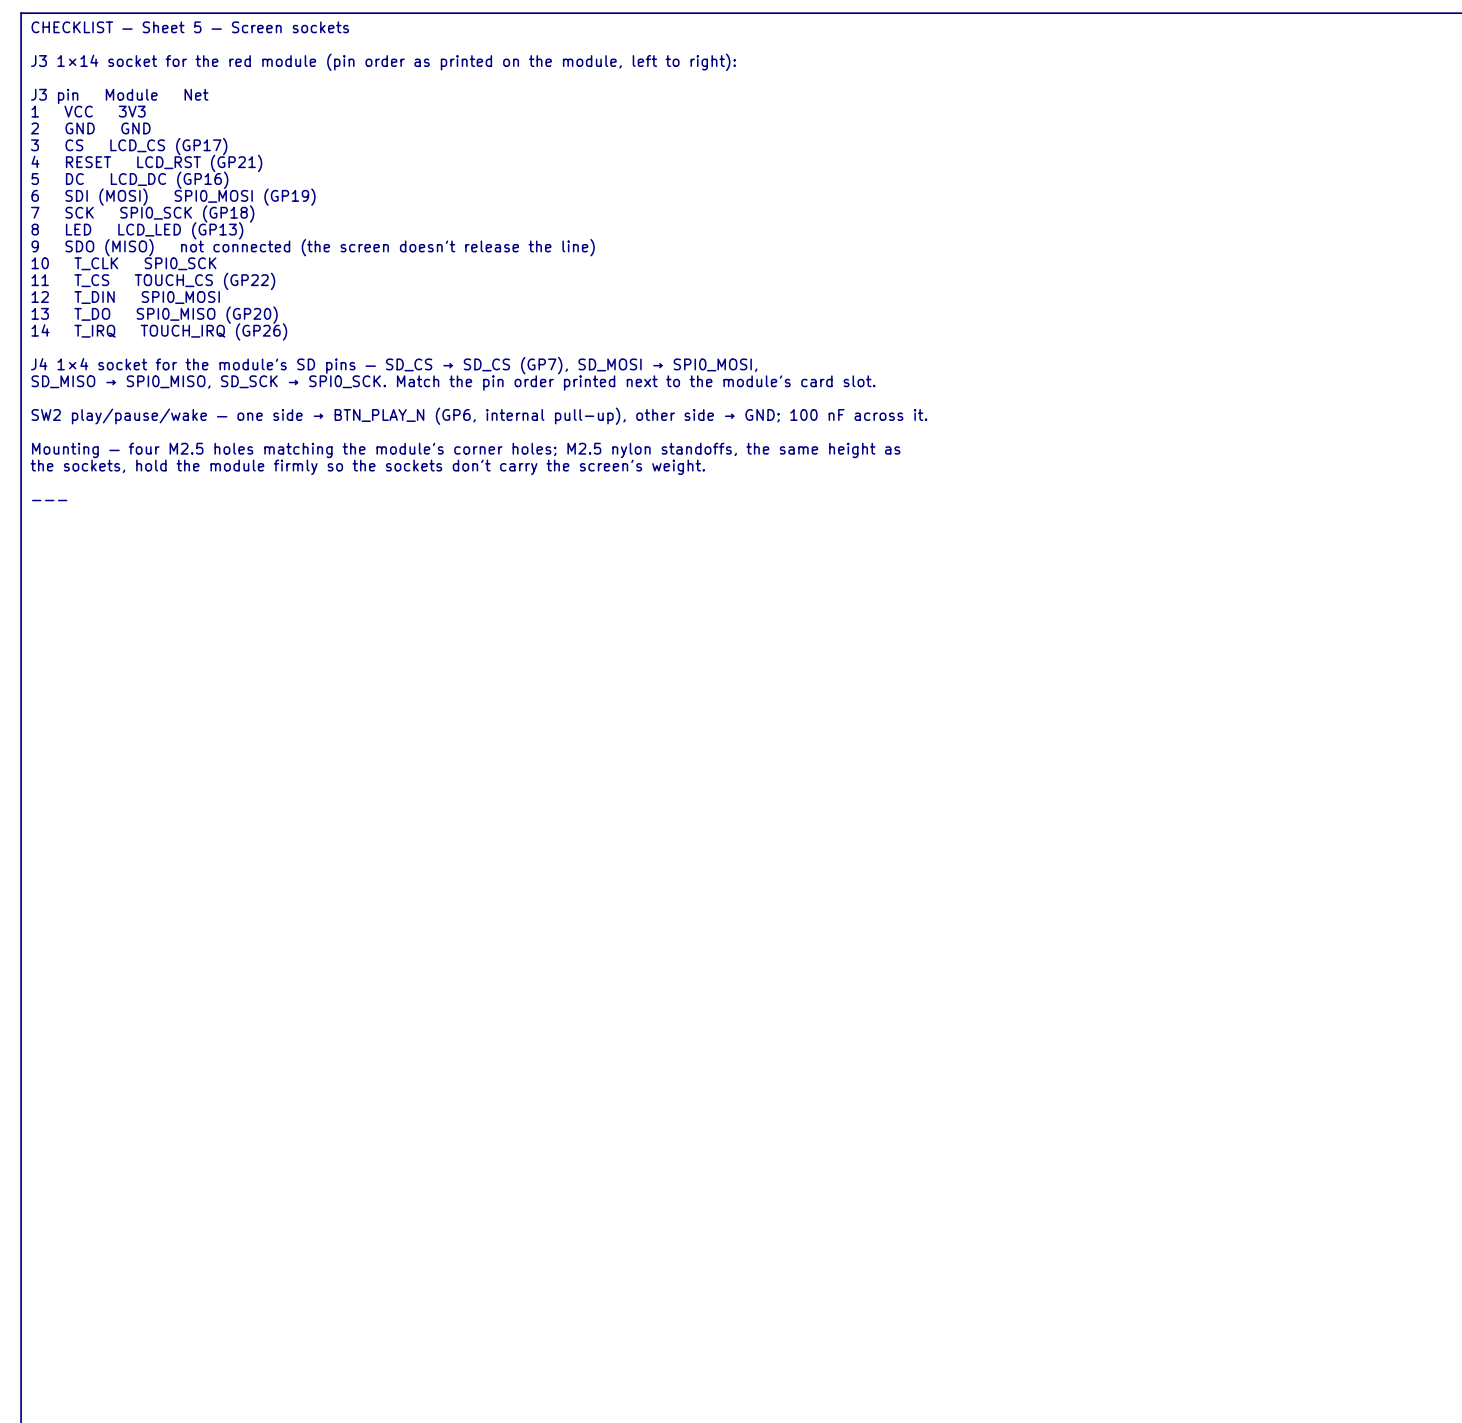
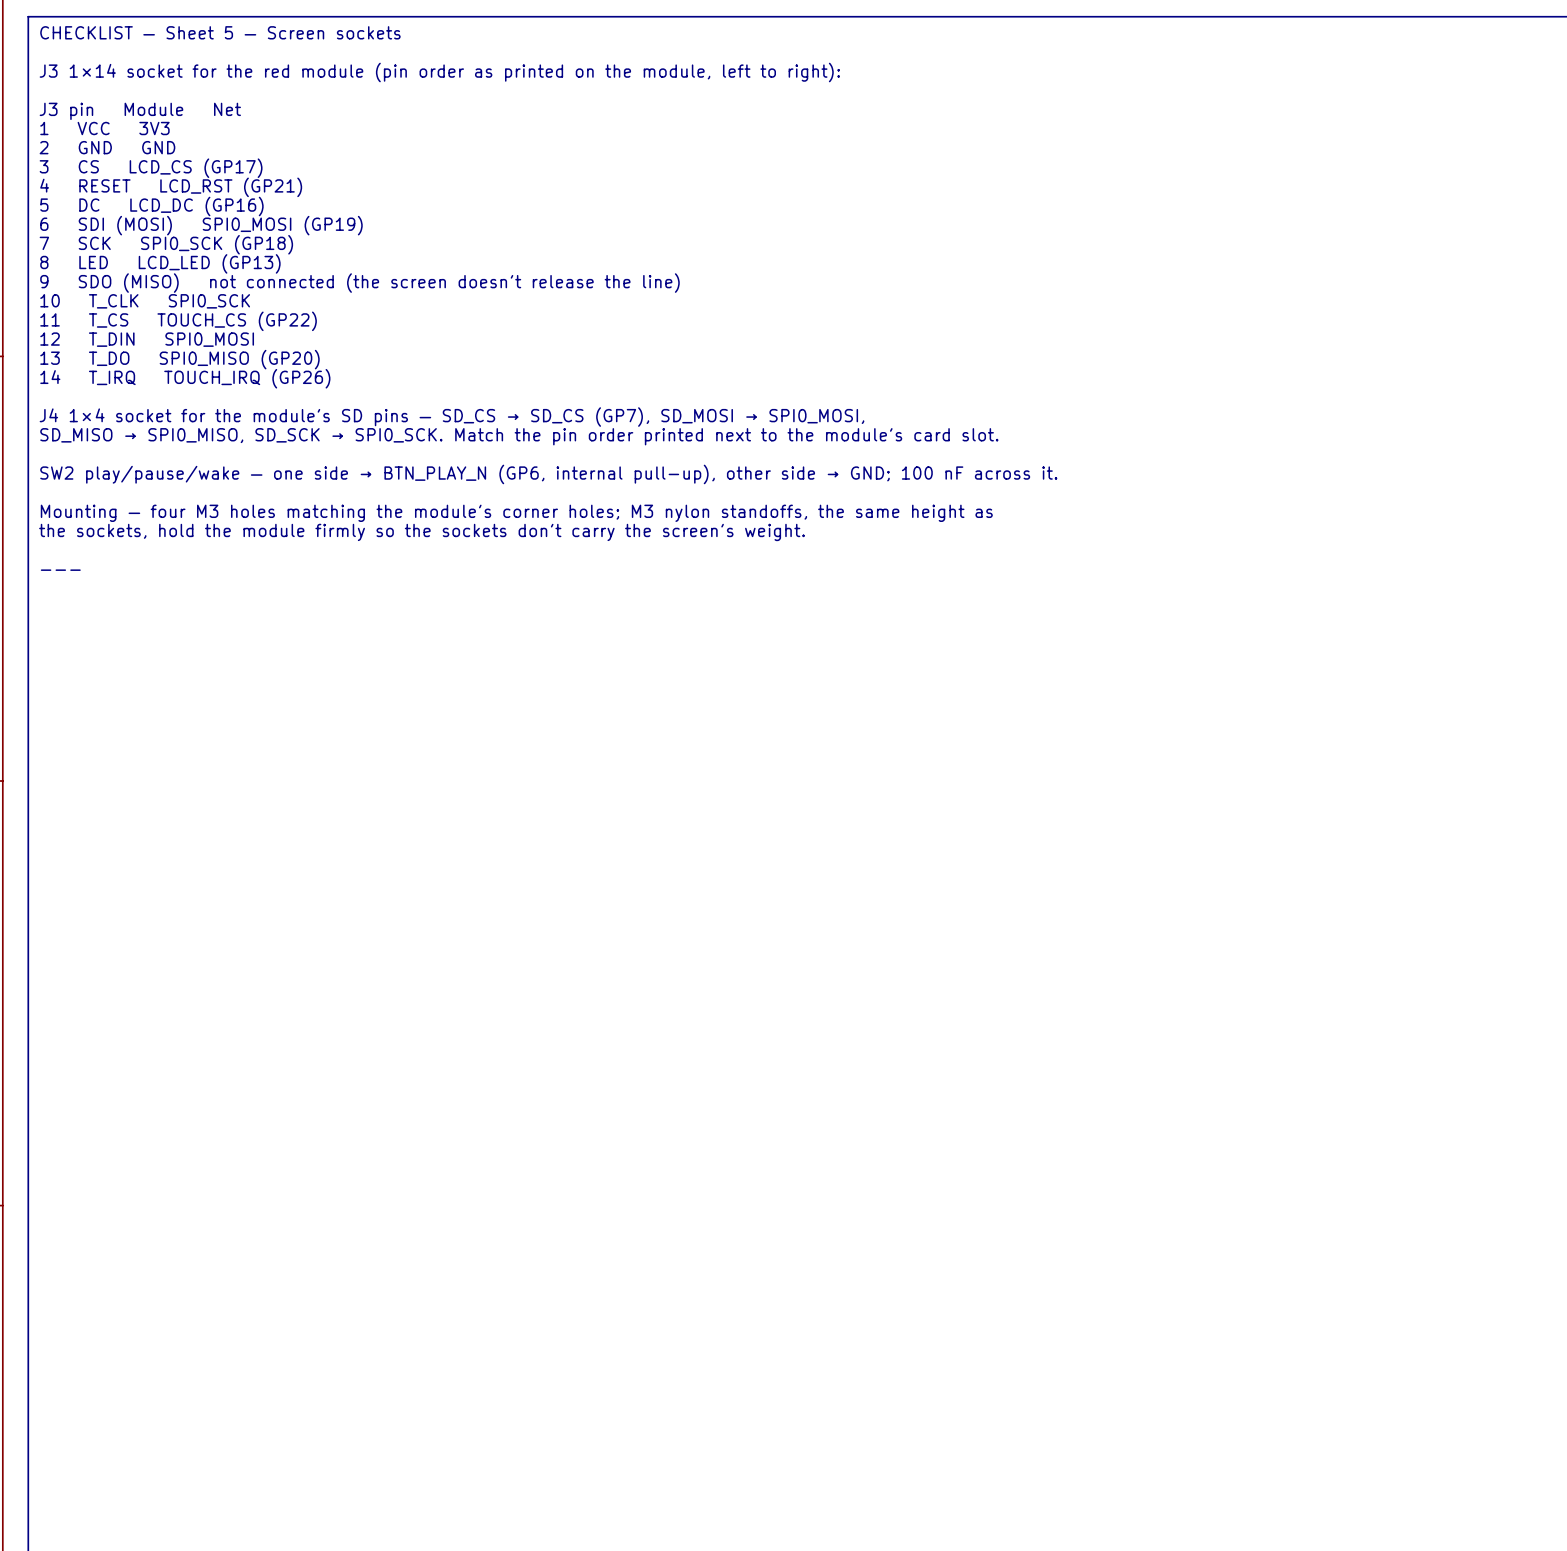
text: Mounting — four M2.5 holes matching the module's corner holes; M2.5 nylon standoffs, the same height as (466, 450) -> Mounting — four M3 holes matching the module's corner holes; M3 nylon standoffs, the same height as (516, 513)

